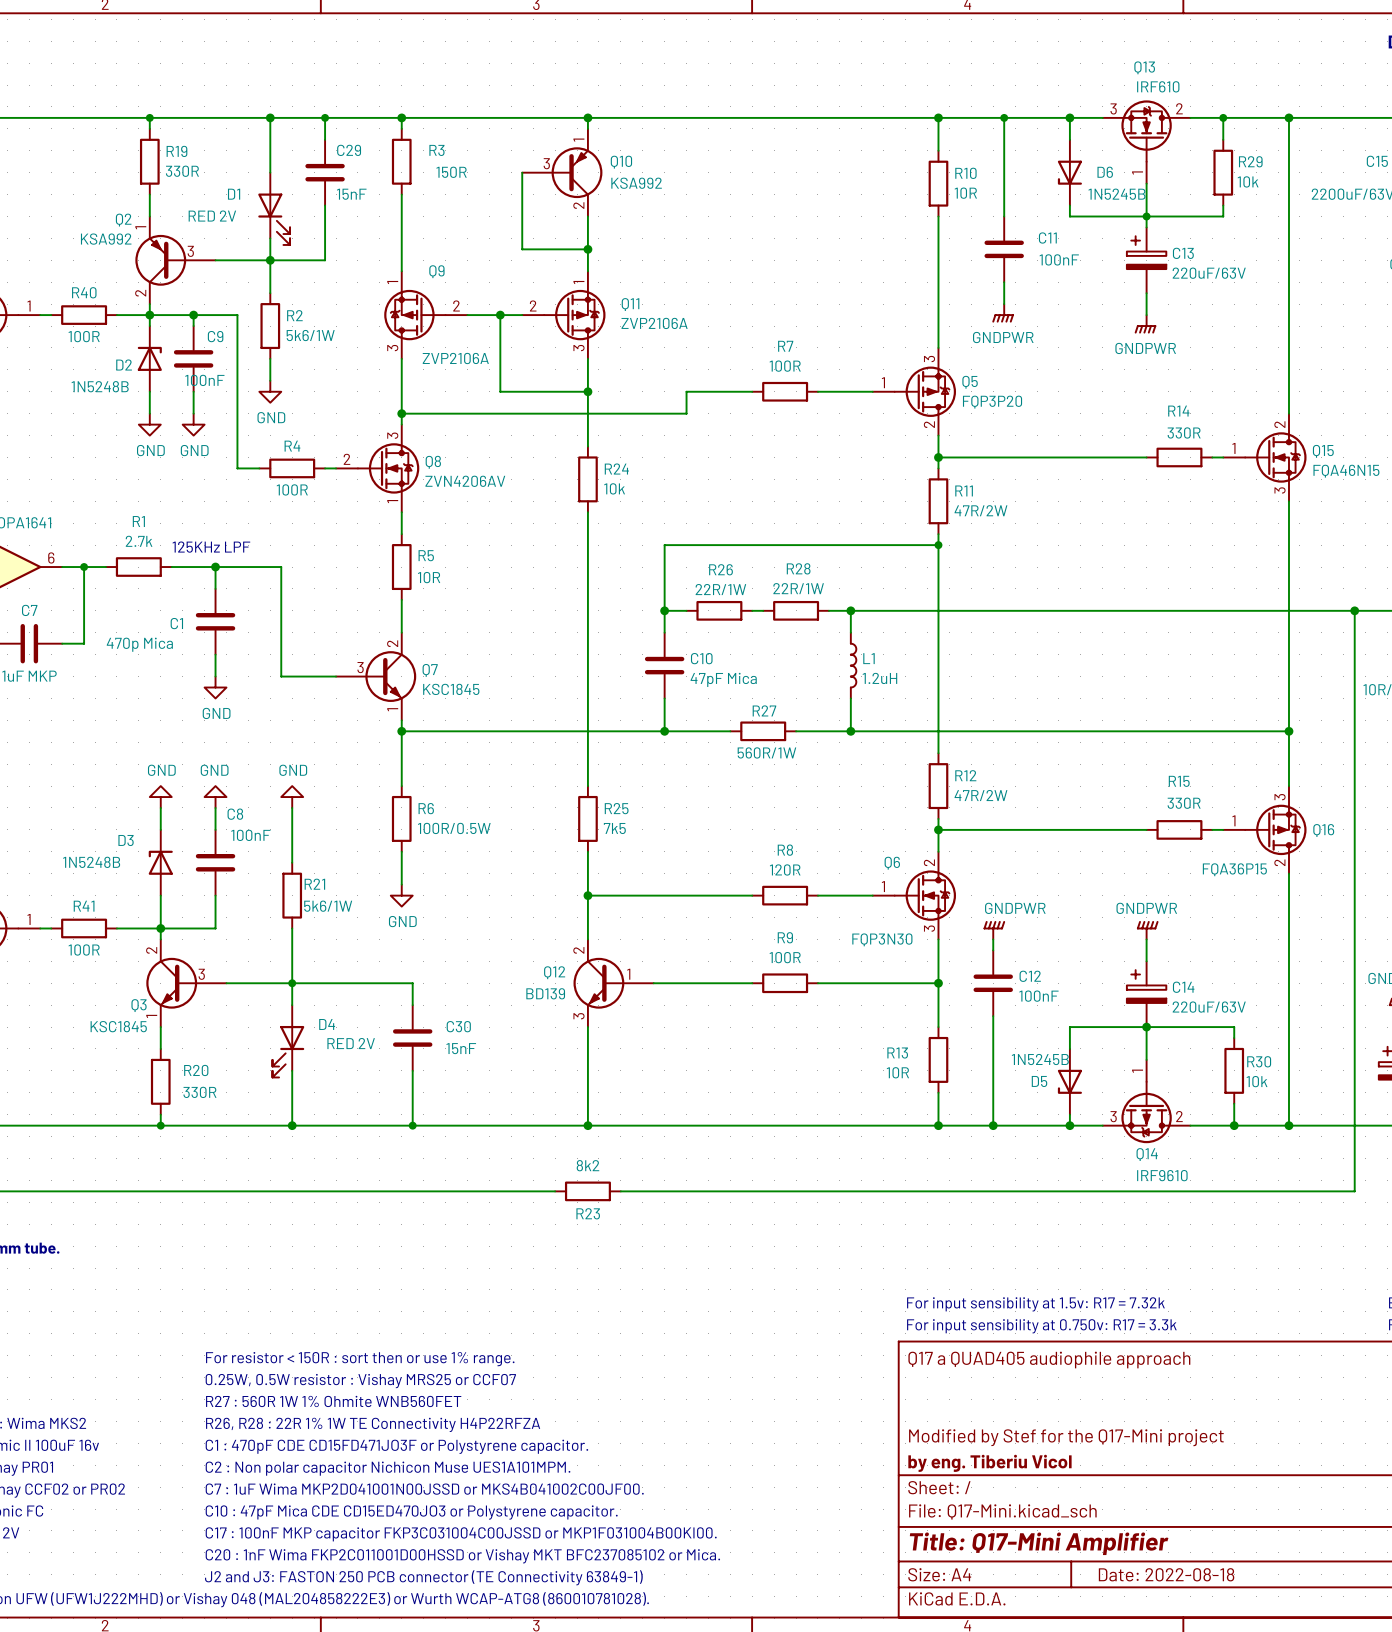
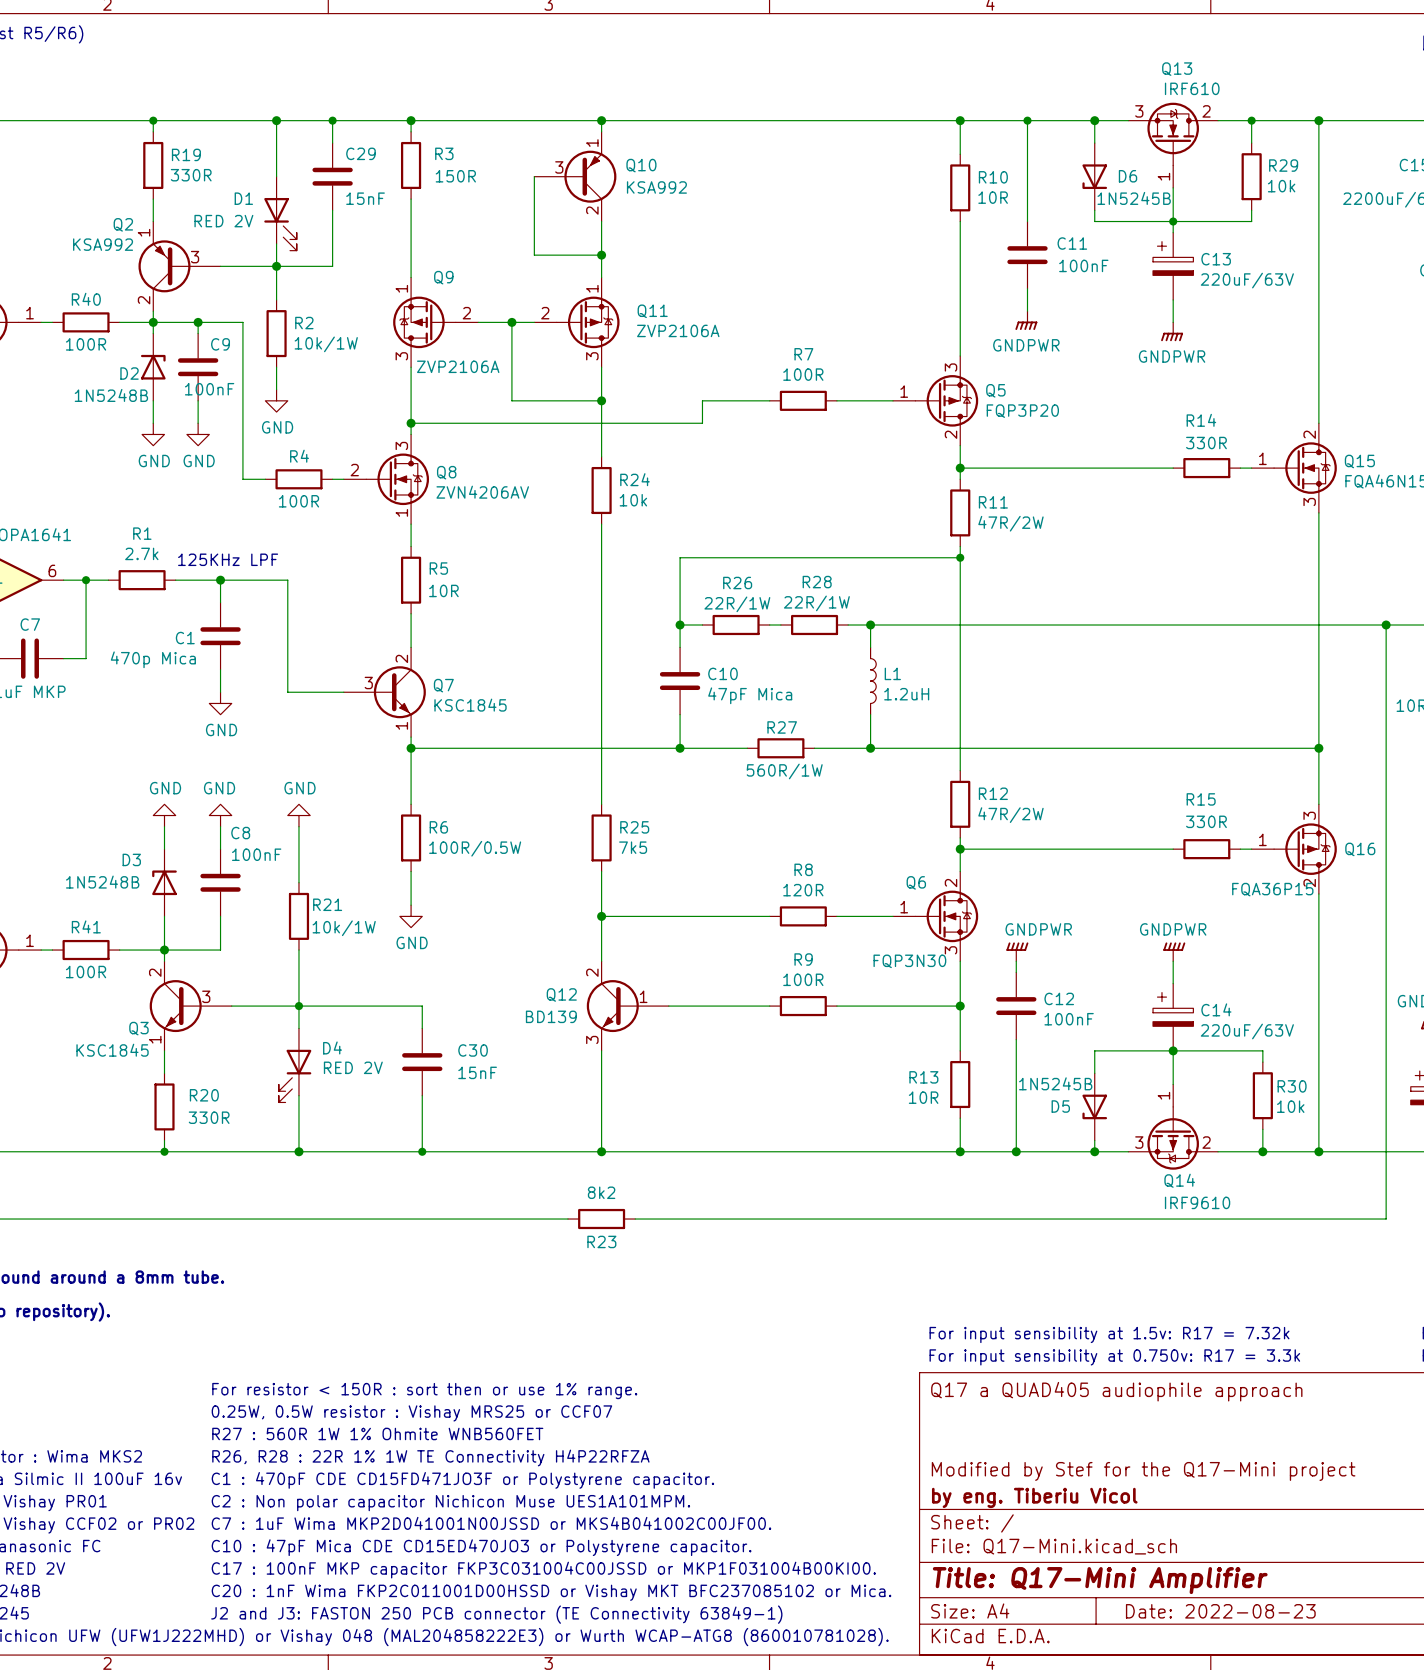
R2 value: 5k6/1W (310, 335) -> 10k/1W (326, 344)
R21 value: 5k6/1W (328, 906) -> 10k/1W (344, 928)
title block: Date: 2022-08-18 (1166, 1574) -> Date: 2022-08-23 (1220, 1611)

